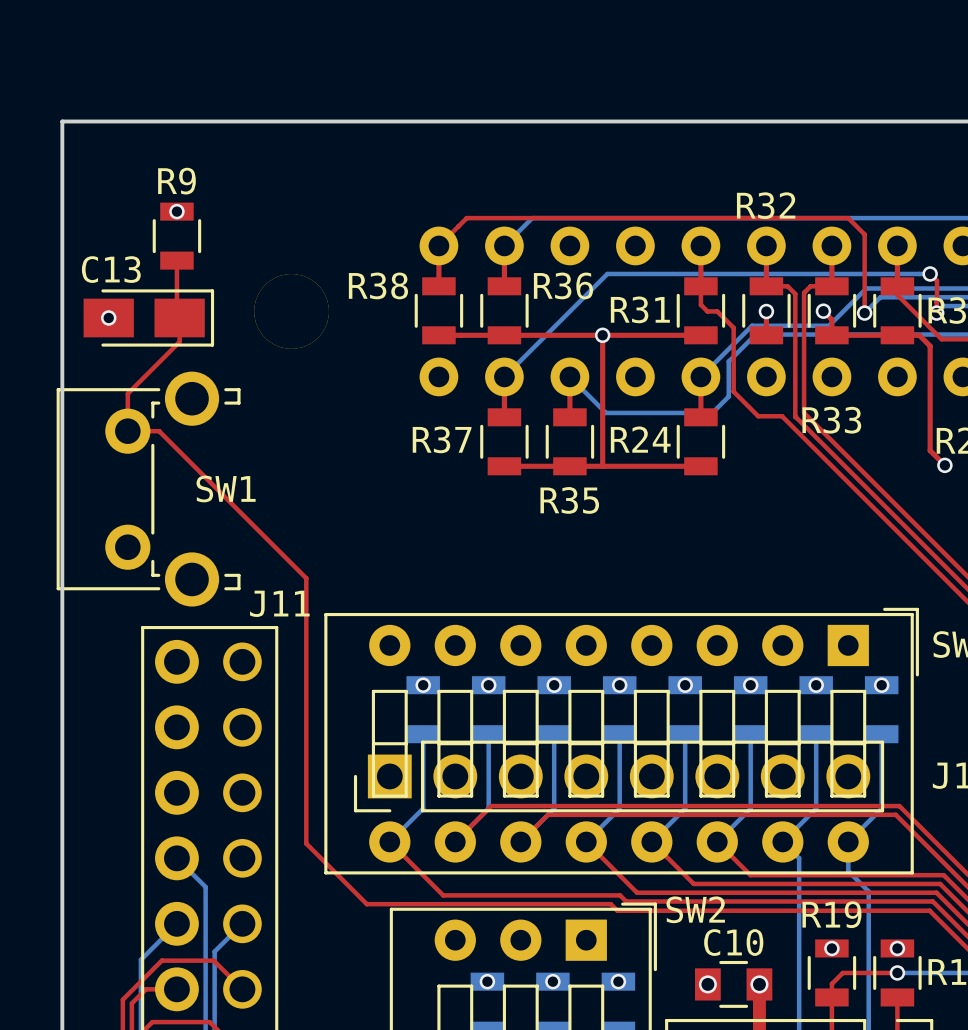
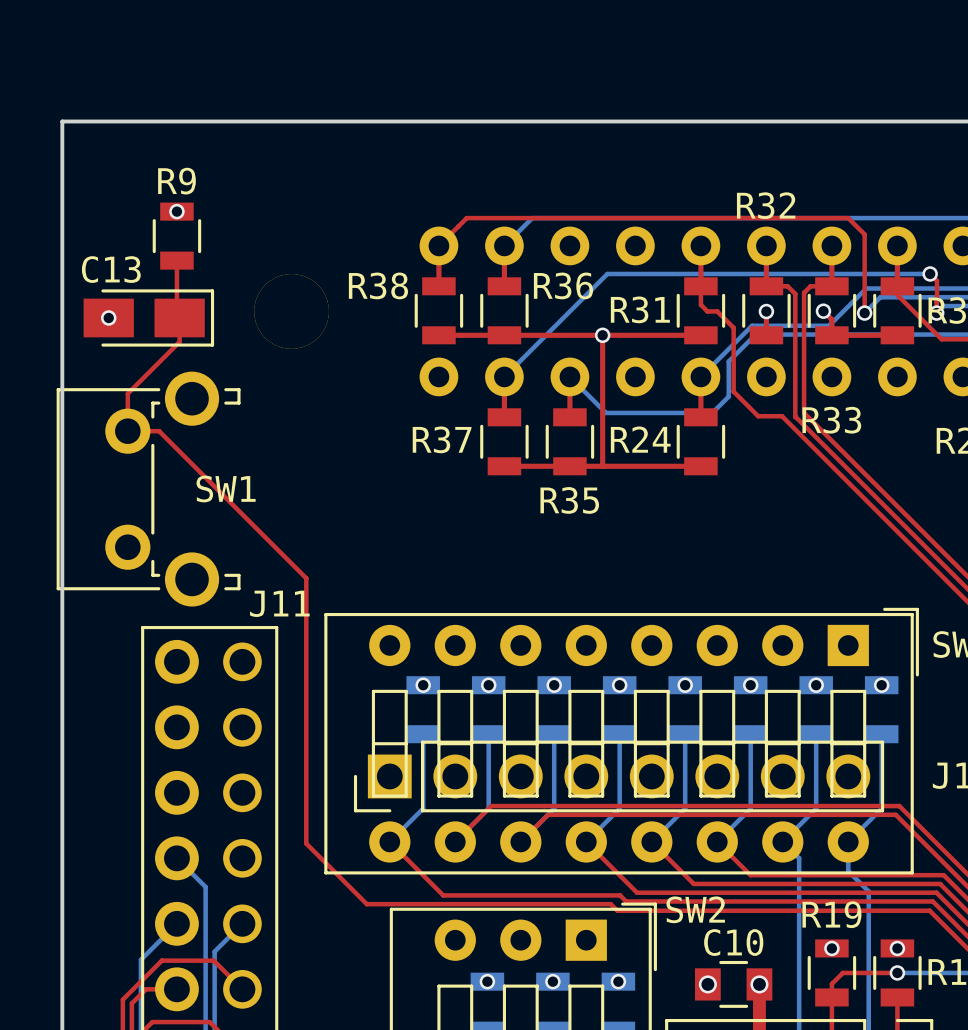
top track: (897, 335) (919, 335) (930, 346) (930, 450) (944, 465) -> none
via: (944, 465) -> none

